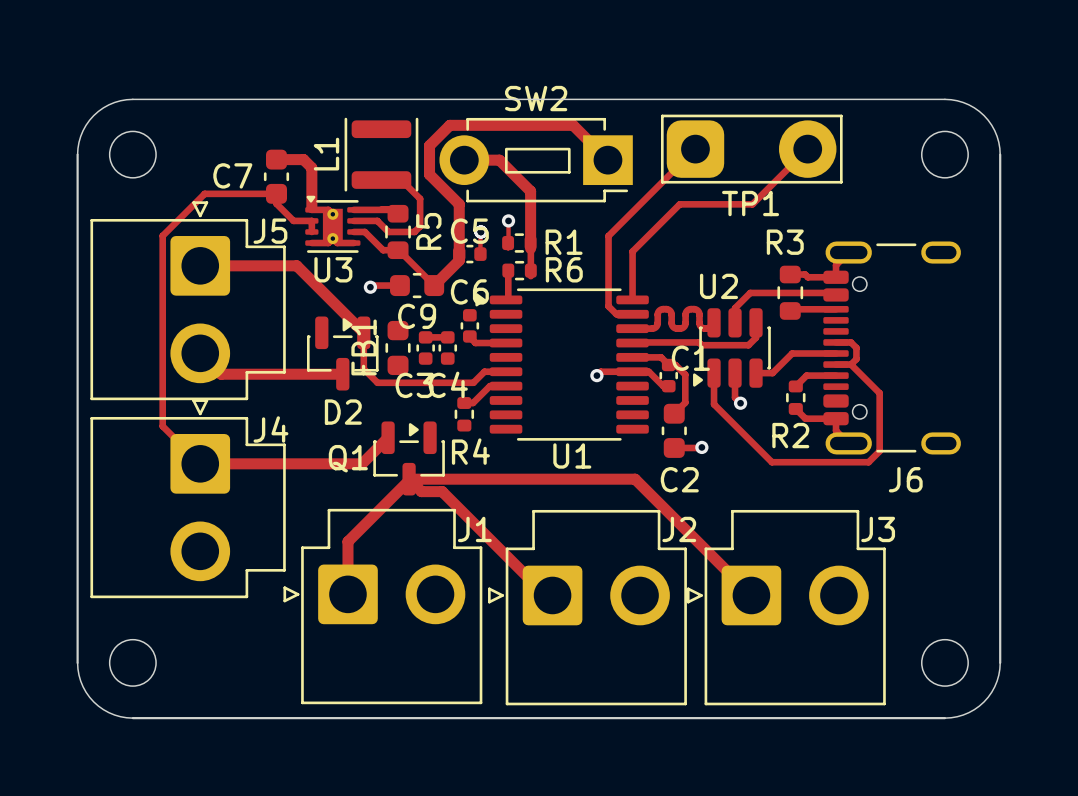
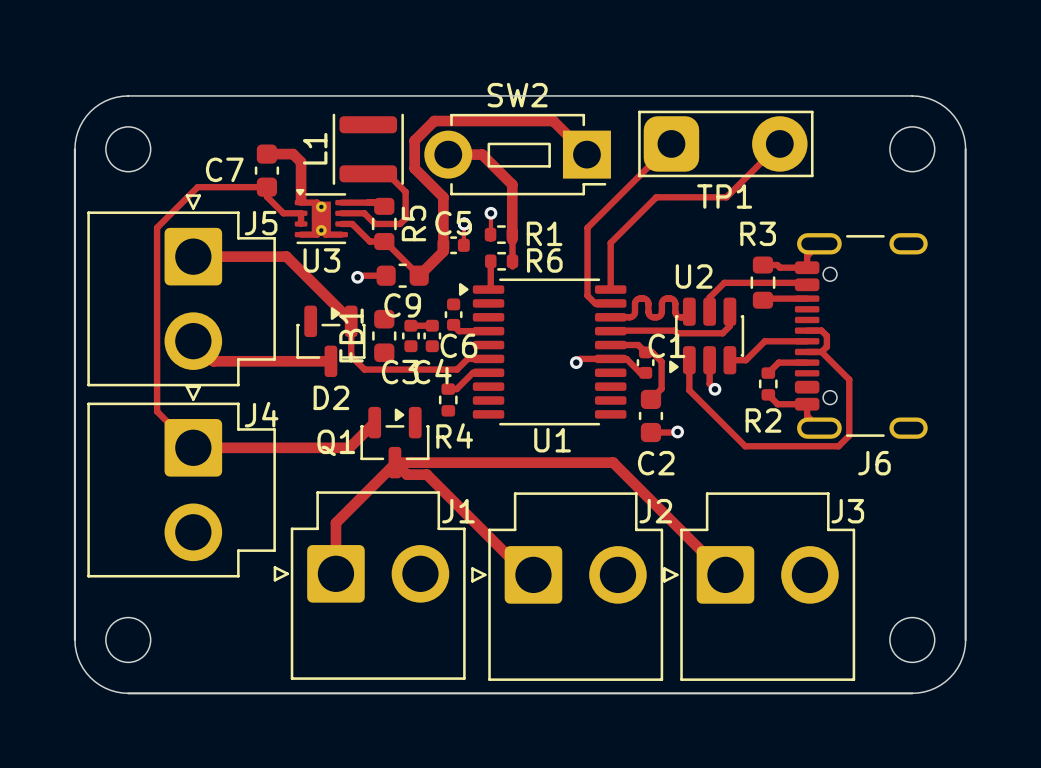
C6 name position: C6 (469, 291) -> C6 (458, 345)

